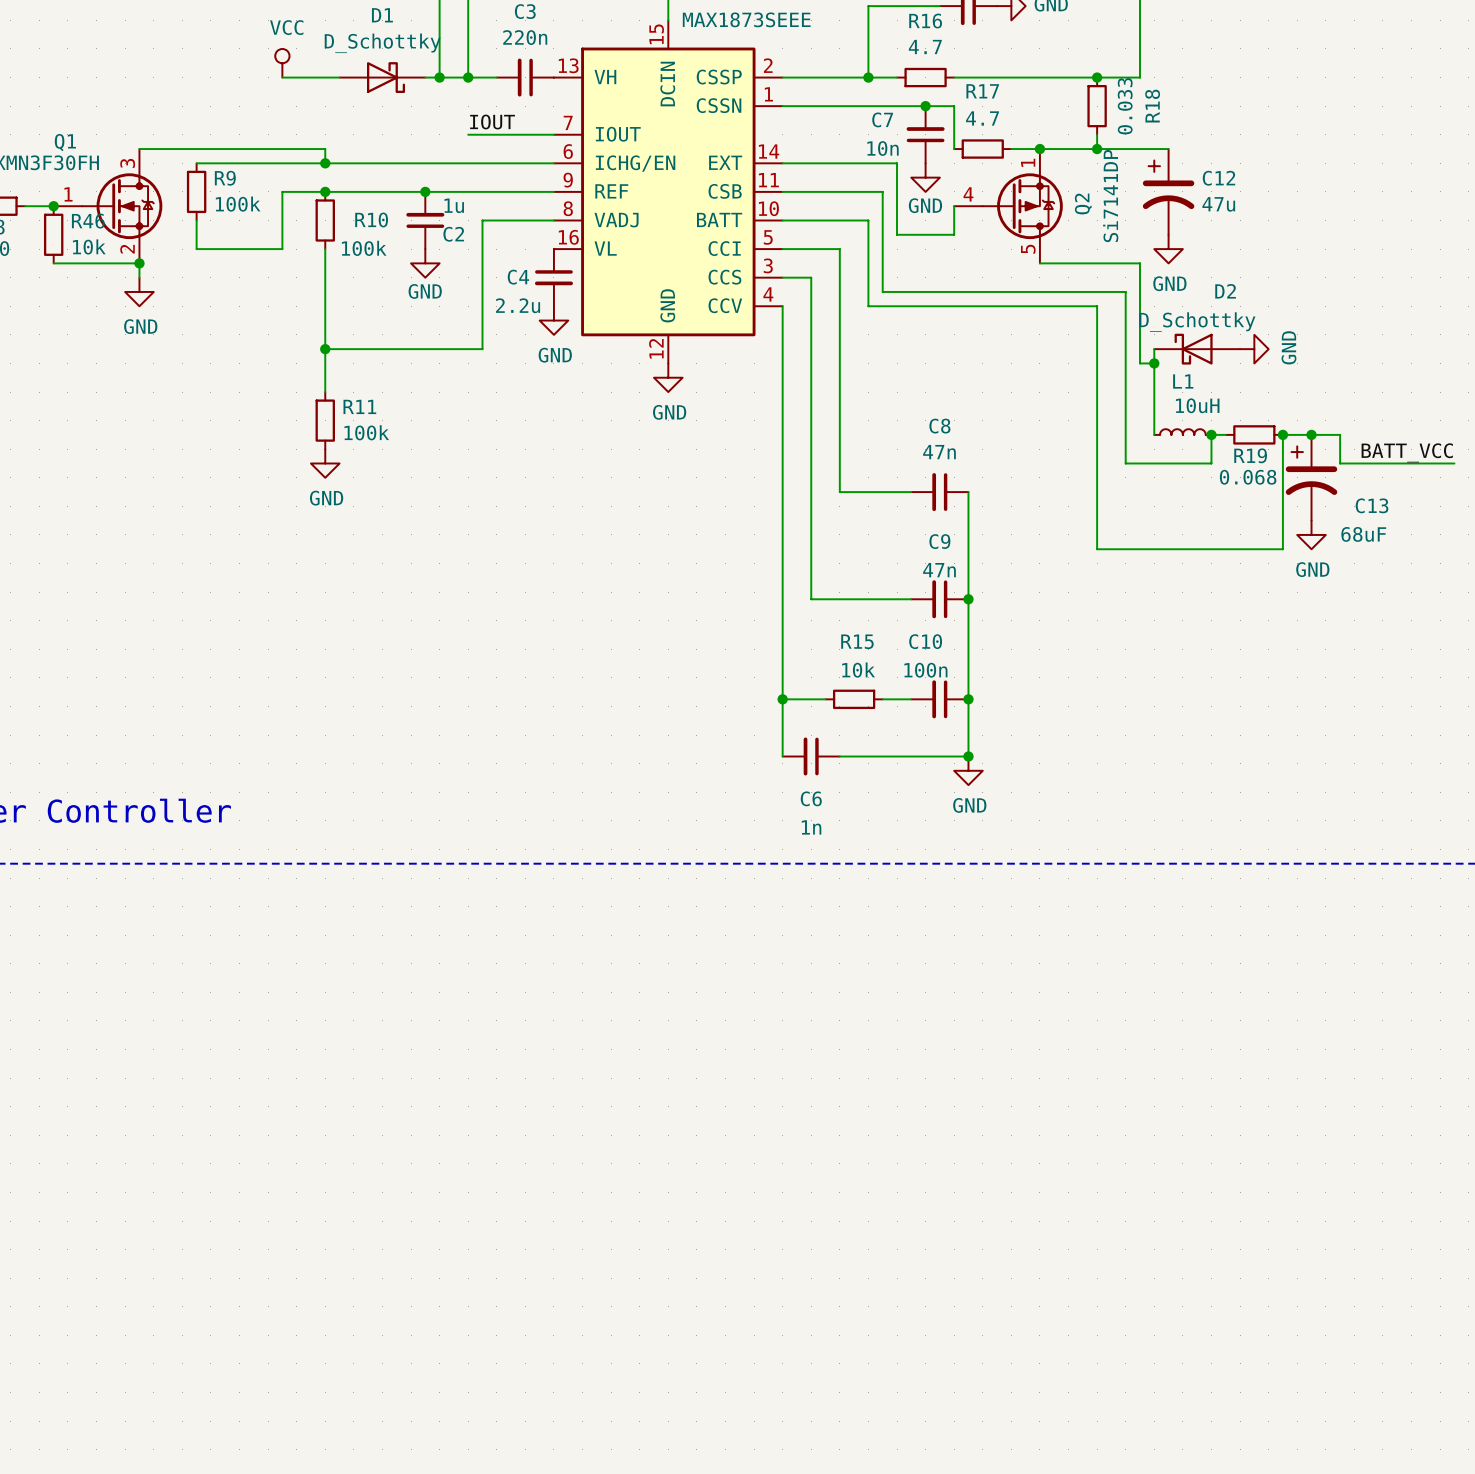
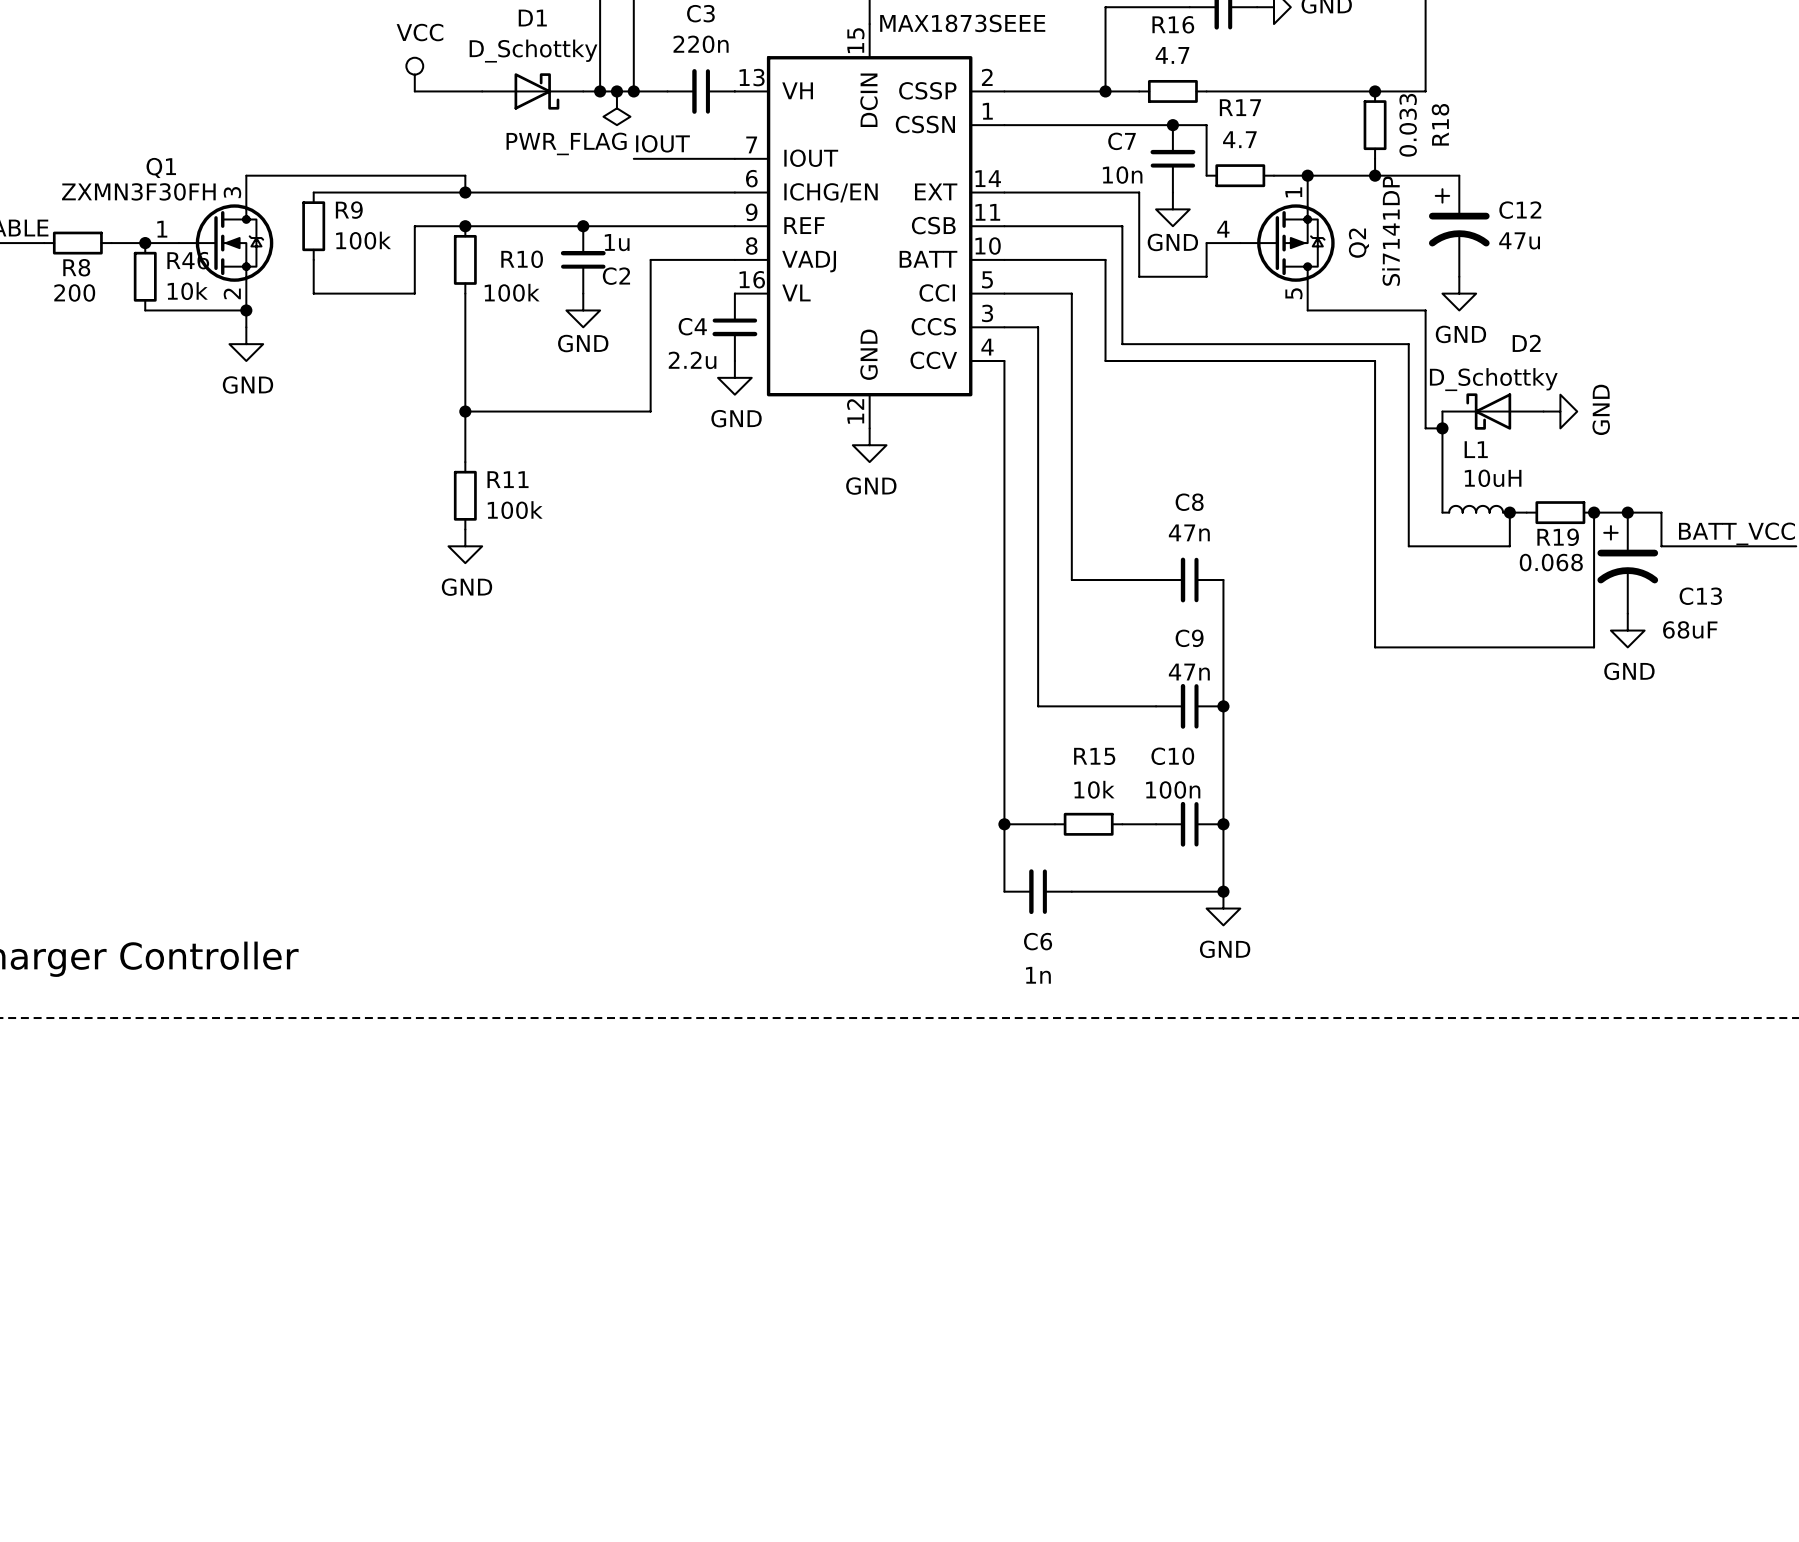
junction: none -> (616, 91)
power symbol: none -> PWR_FLAG (616, 108)

